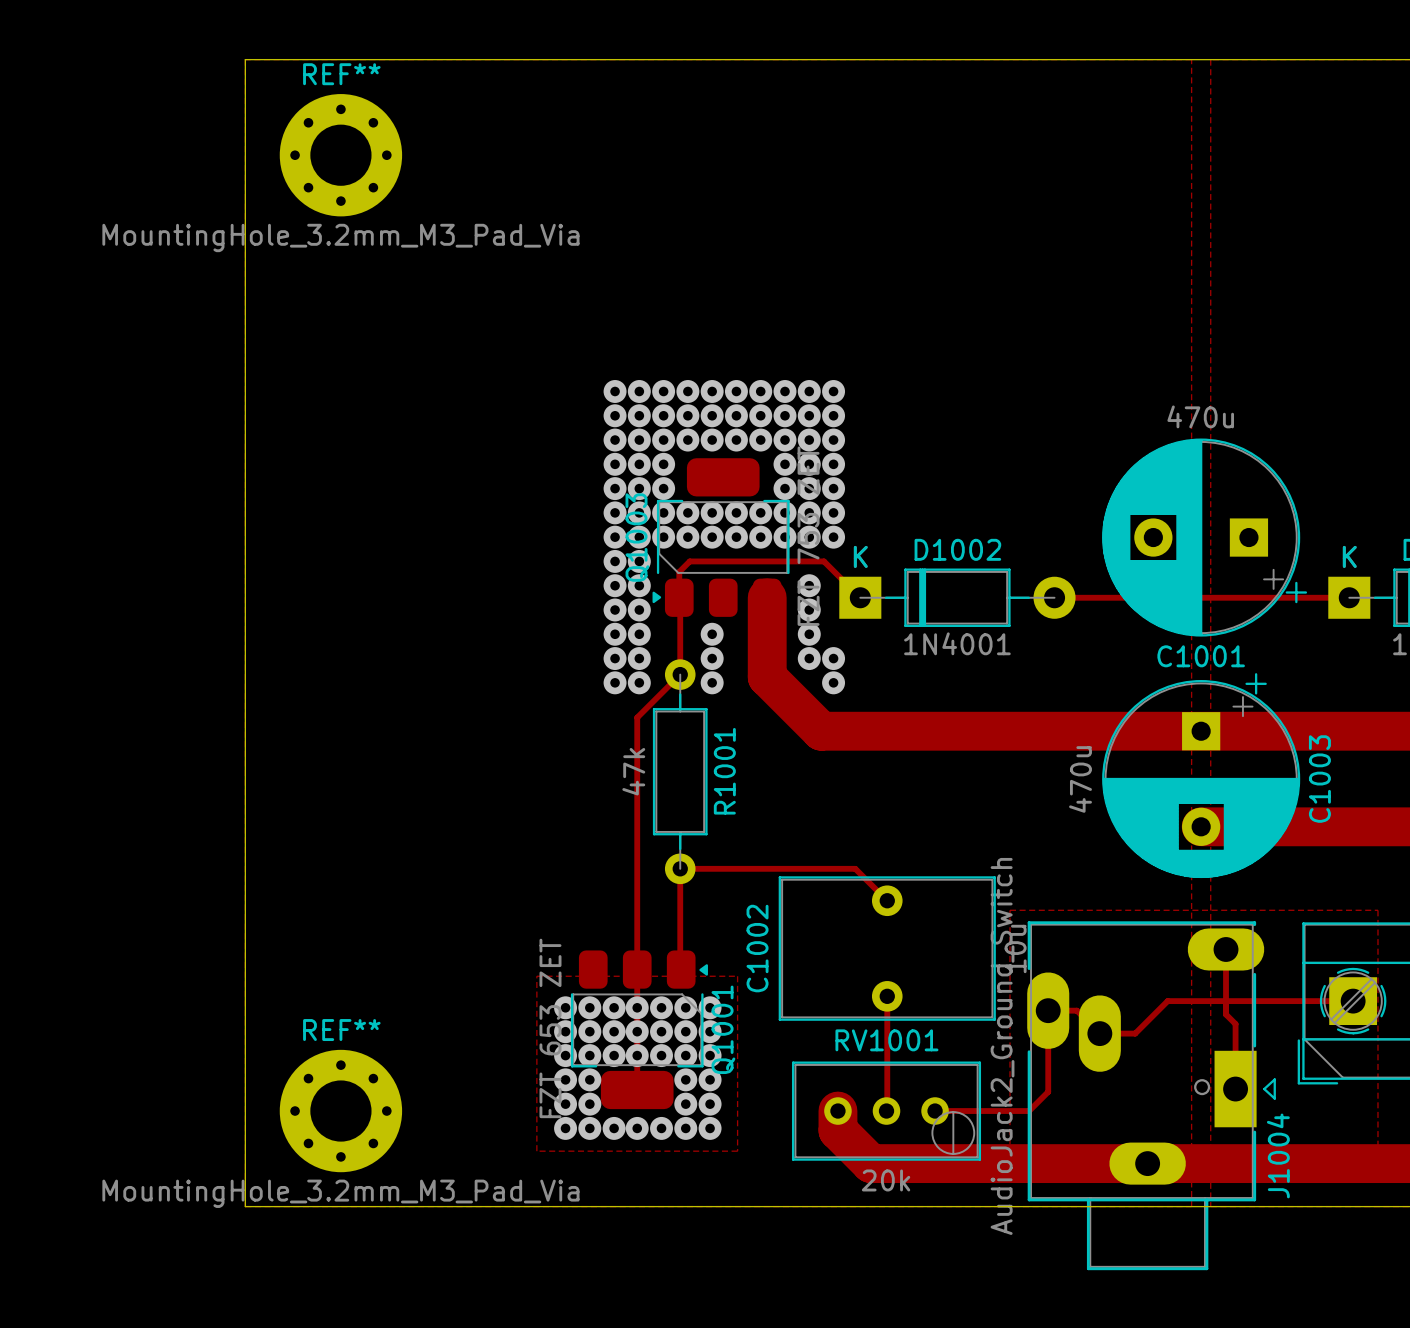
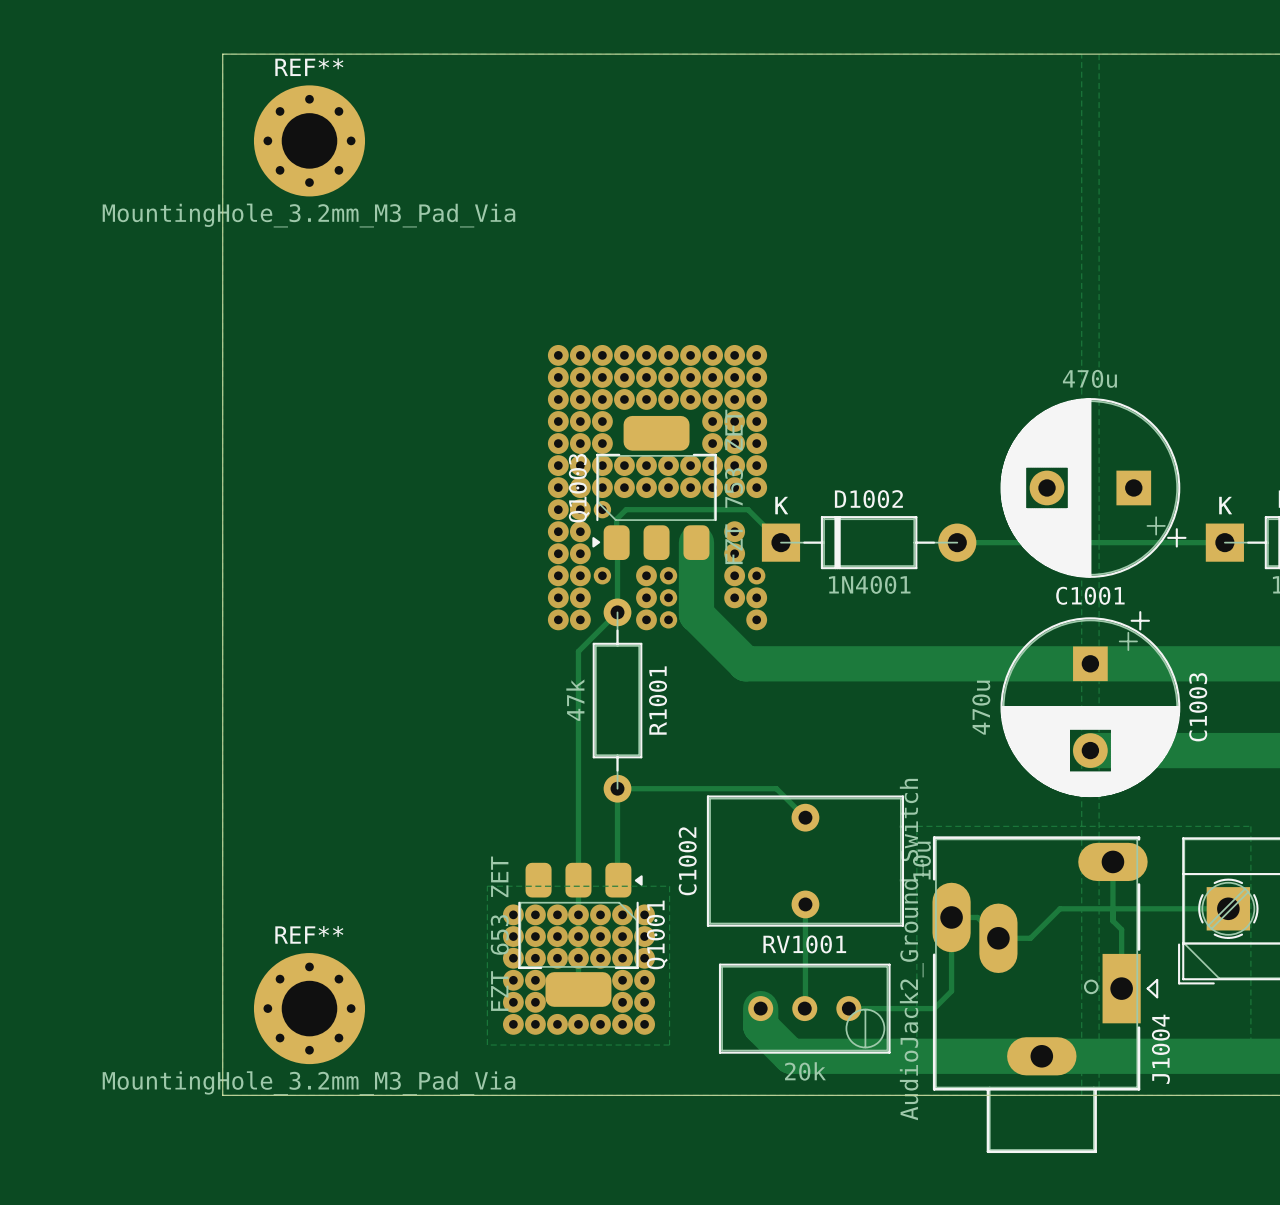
via: none -> (602, 509)
via: none -> (602, 575)
via: none -> (668, 575)
via: none -> (756, 575)
via: none -> (668, 597)
via: none -> (668, 619)

